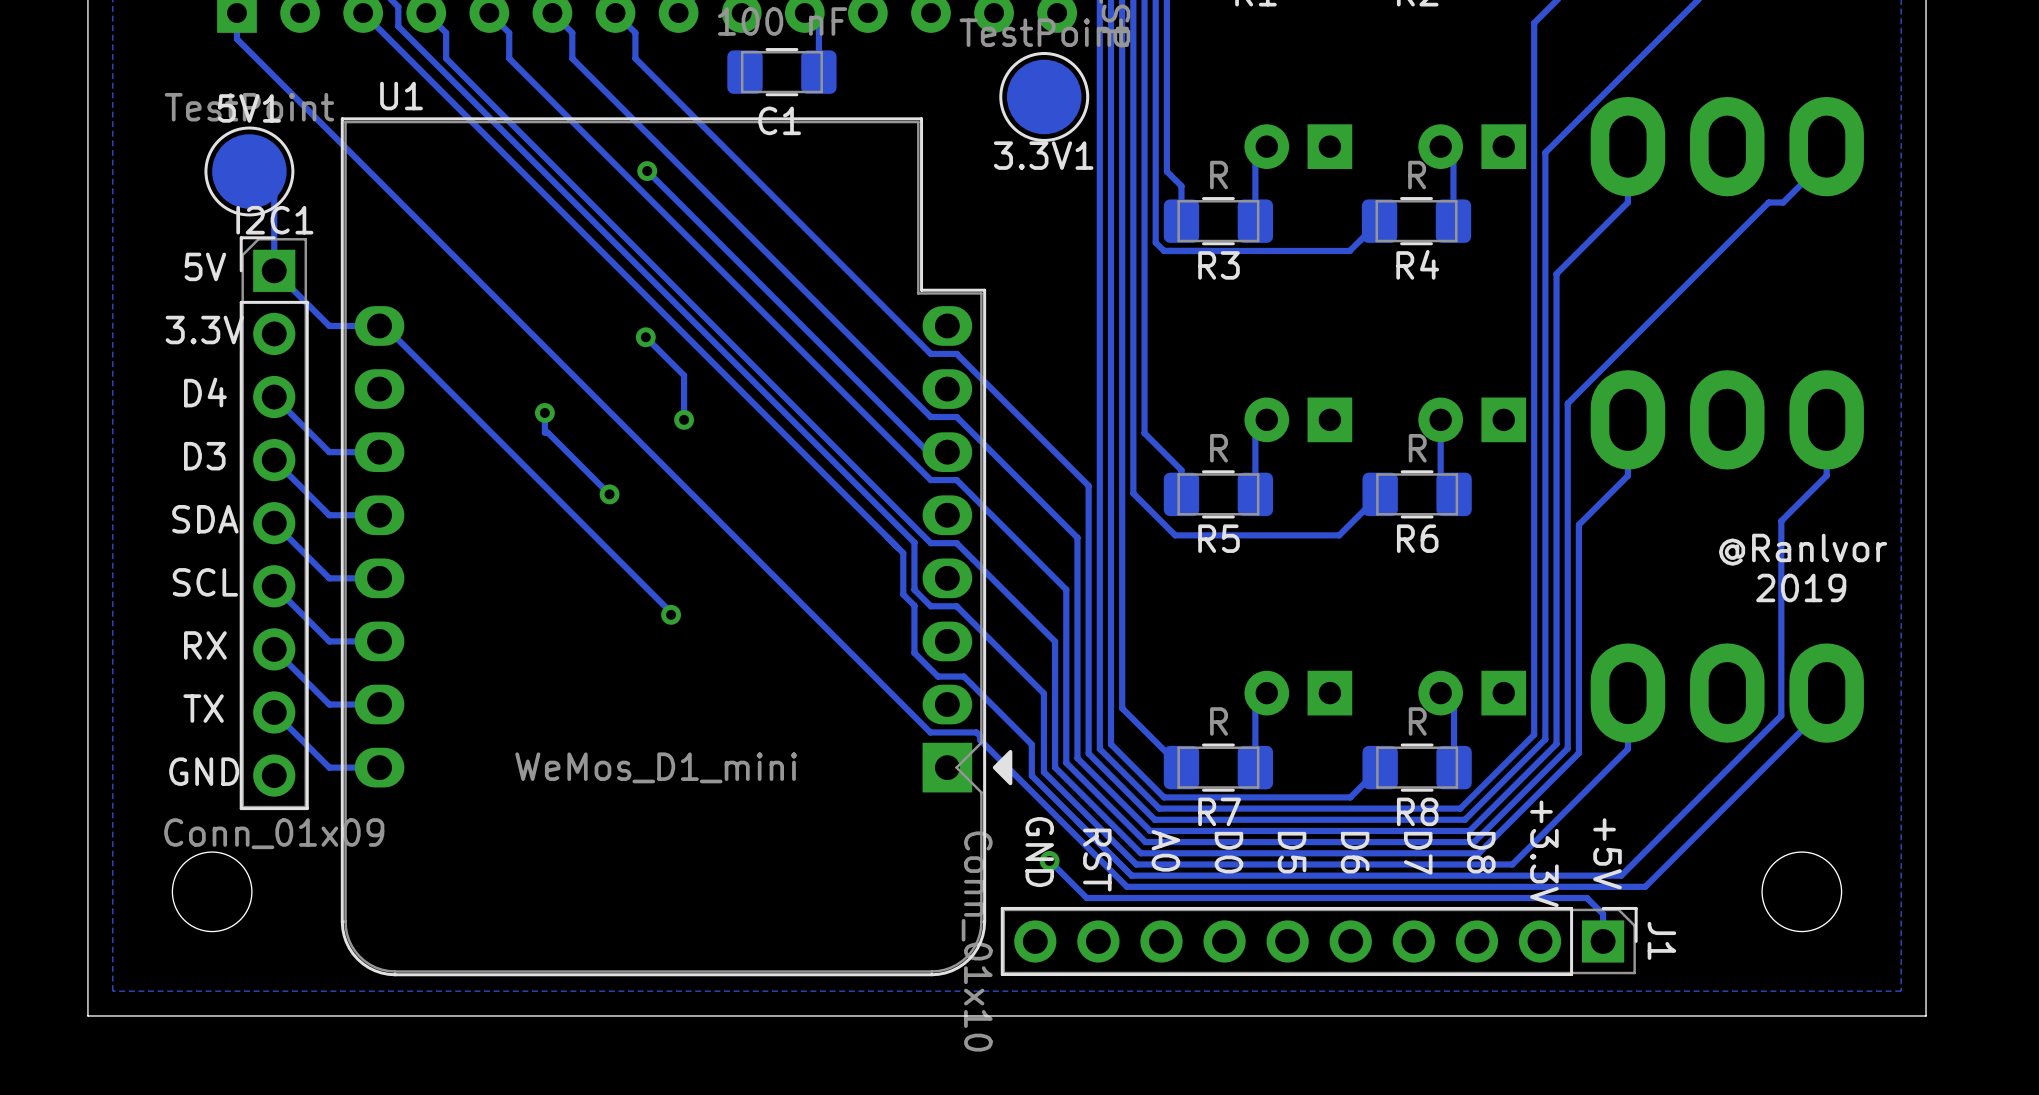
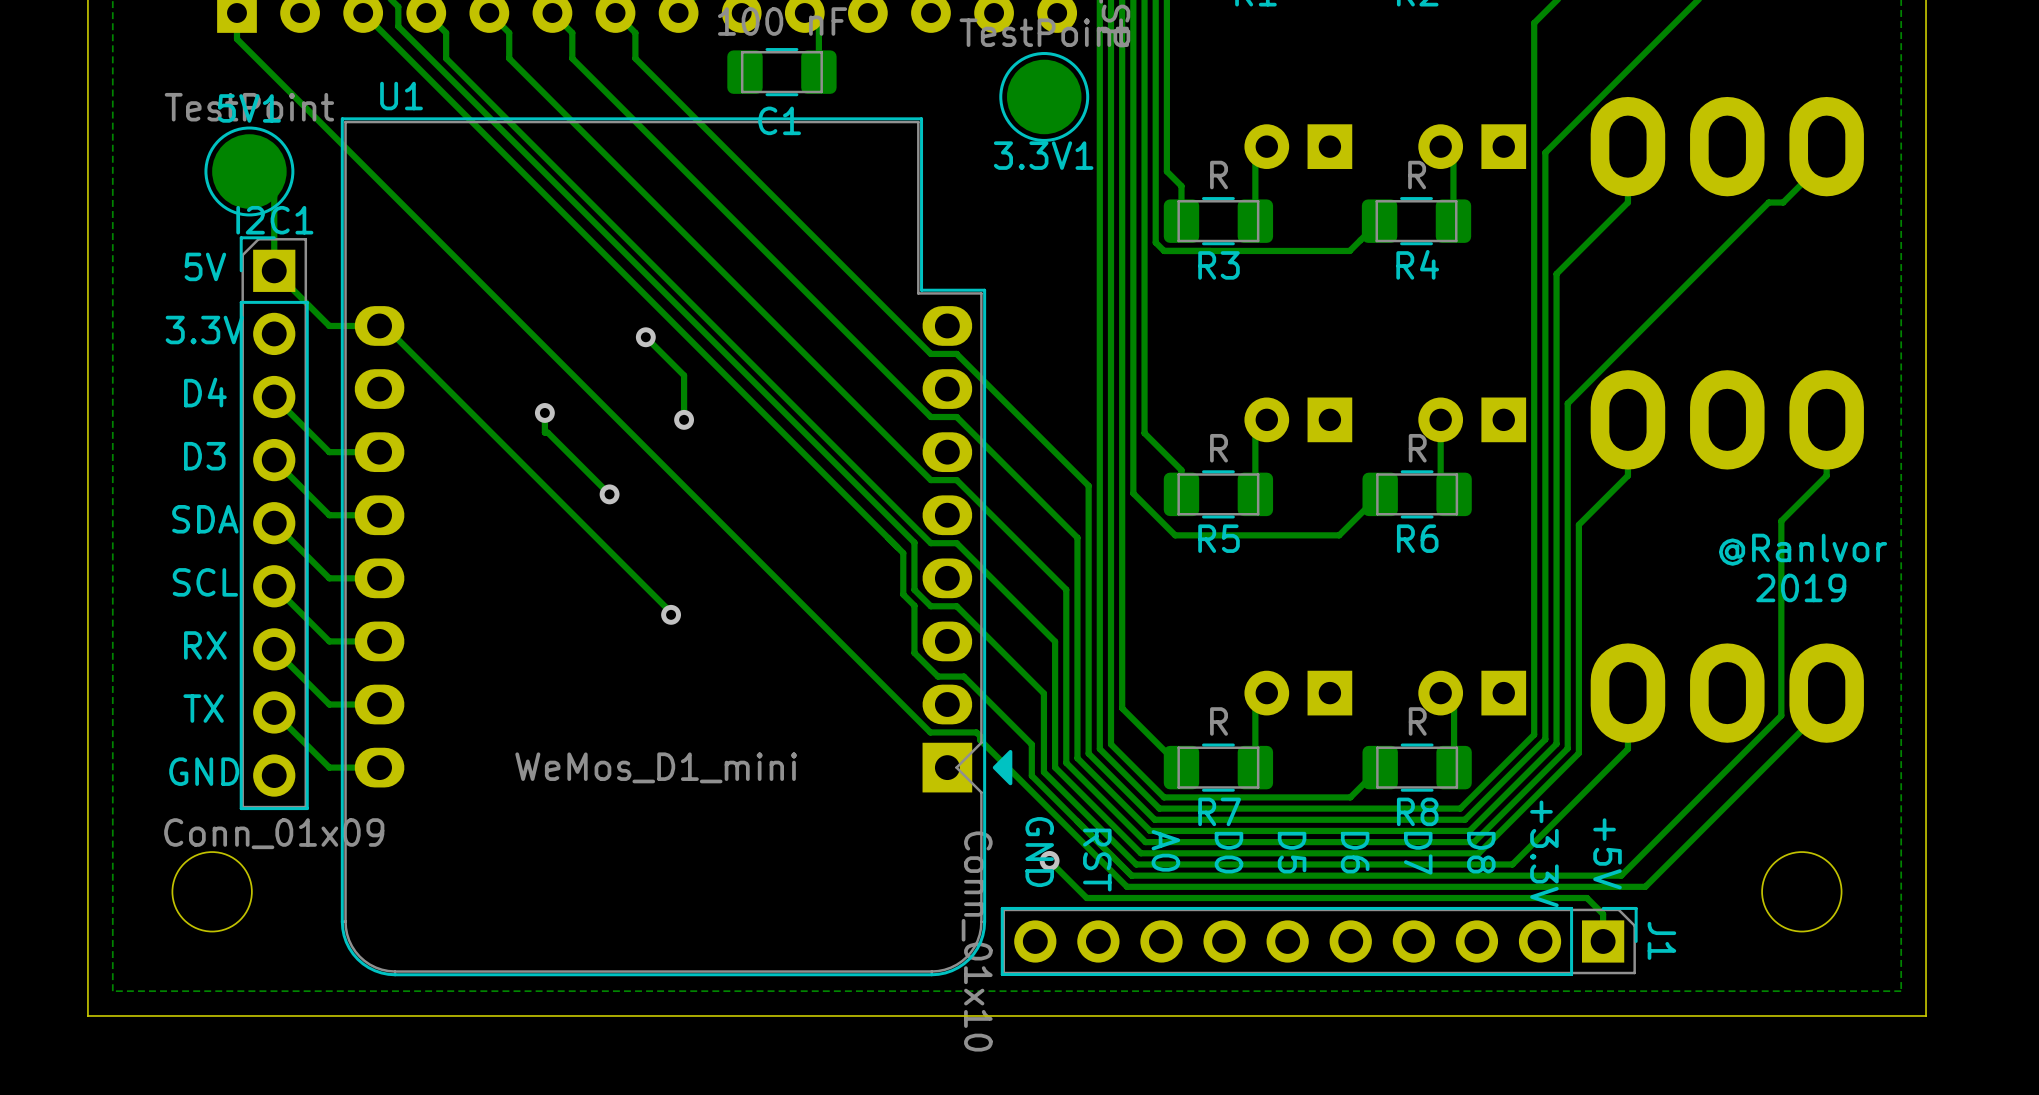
track: (647, 171) (928, 452) (947, 452) -> none
via: (647, 171) -> none

